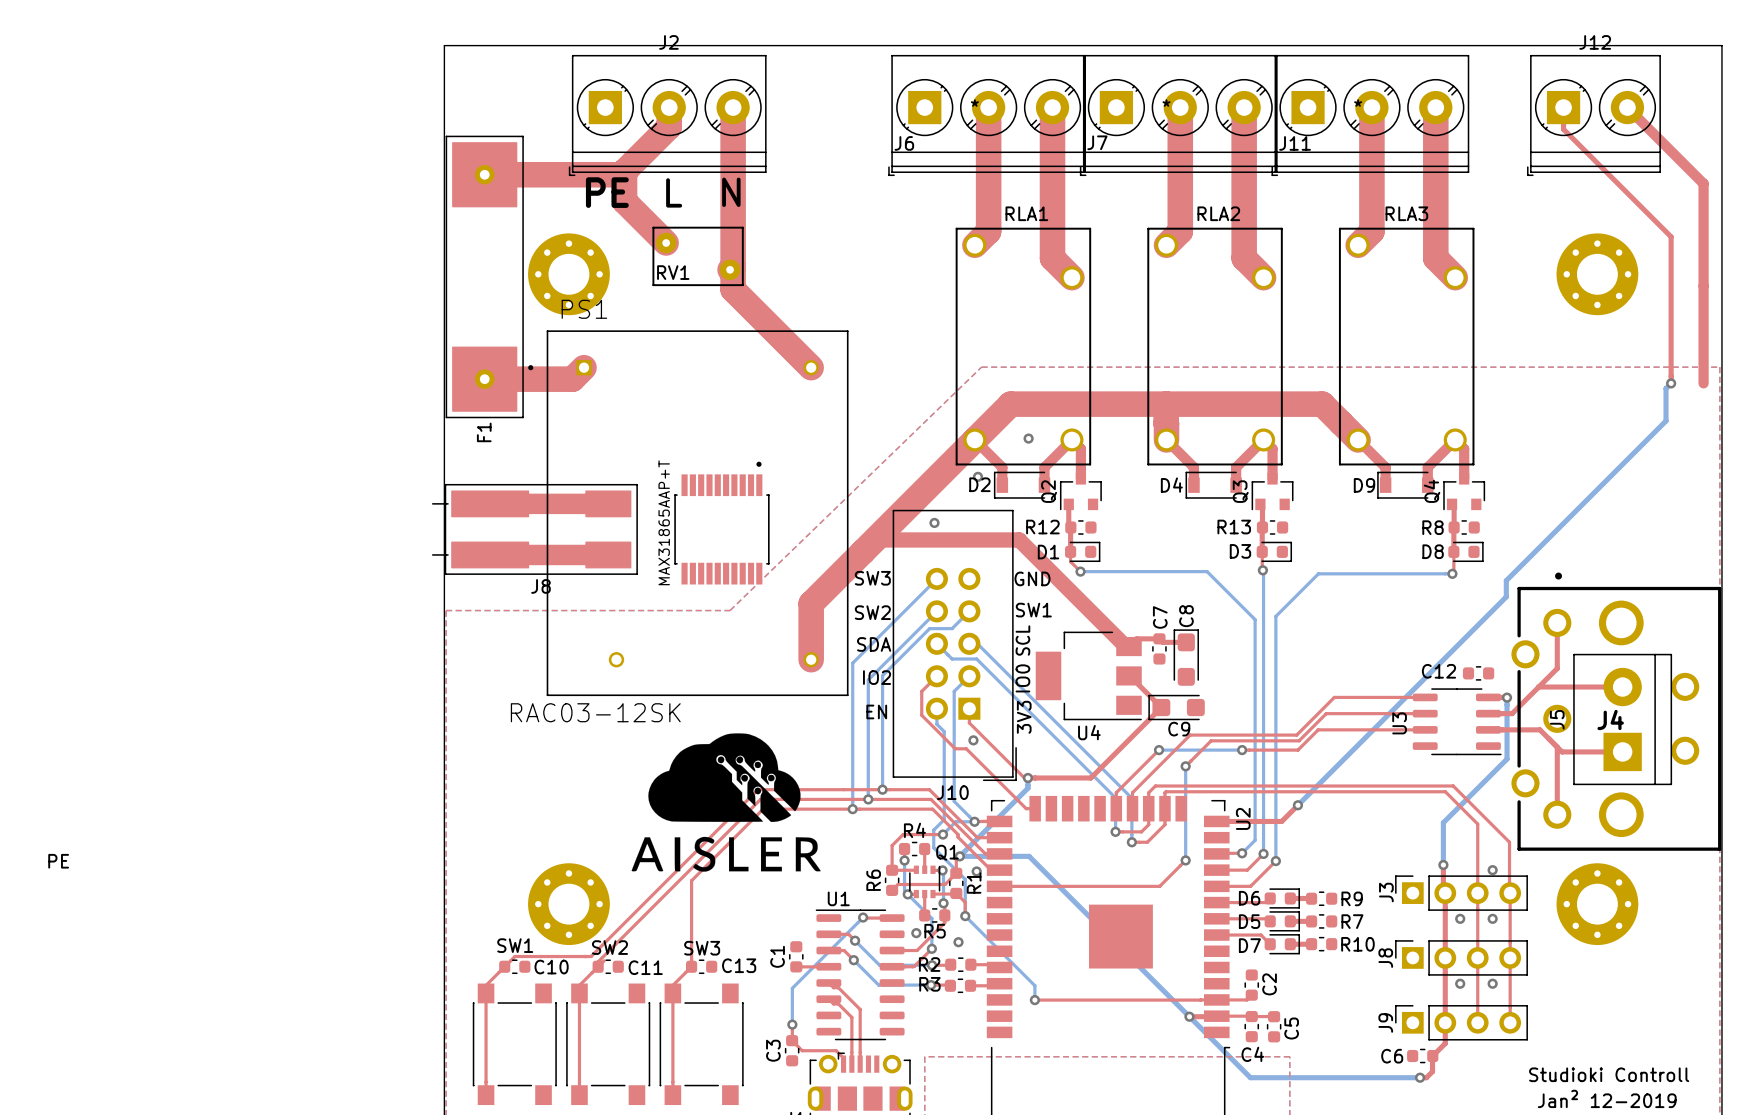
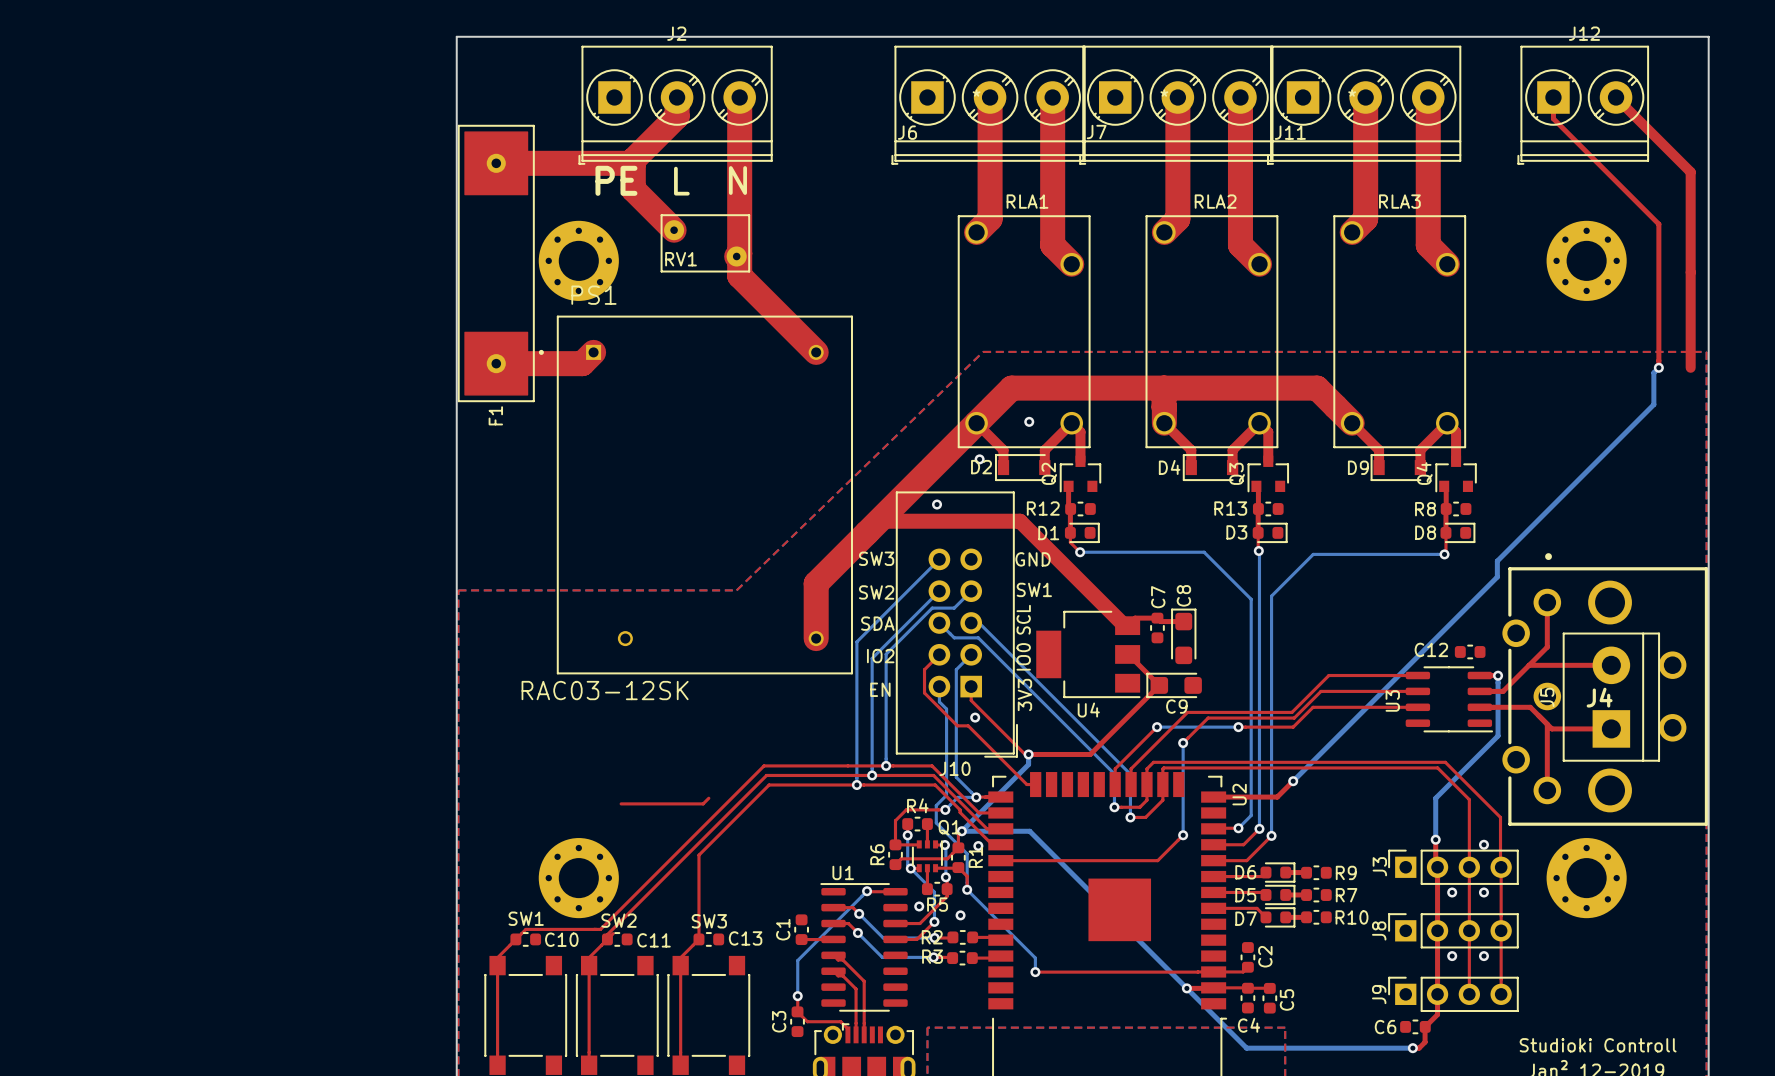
part: MAX31865AAP+T (721, 523) -> none
J8: (534, 529) -> none
drawing: [631, 733, 821, 872] -> none
top track: none -> (708, 798) (703, 803) (621, 803)
text: PE (58, 861) -> none

